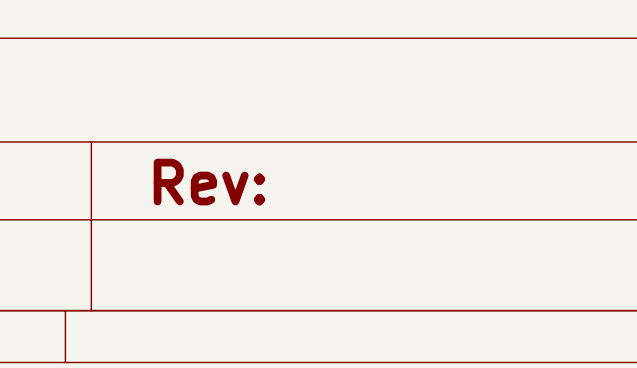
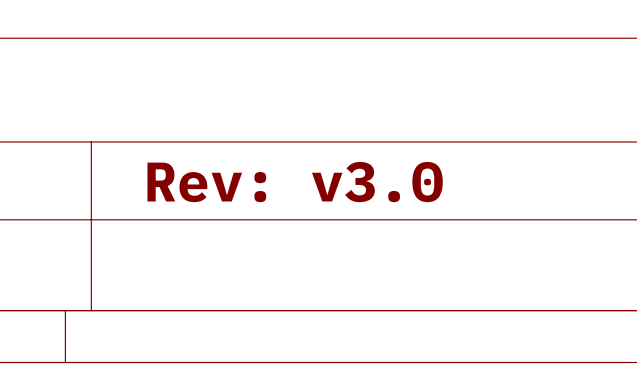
title block: Rev: (209, 182) -> Rev: v3.0 (295, 182)

